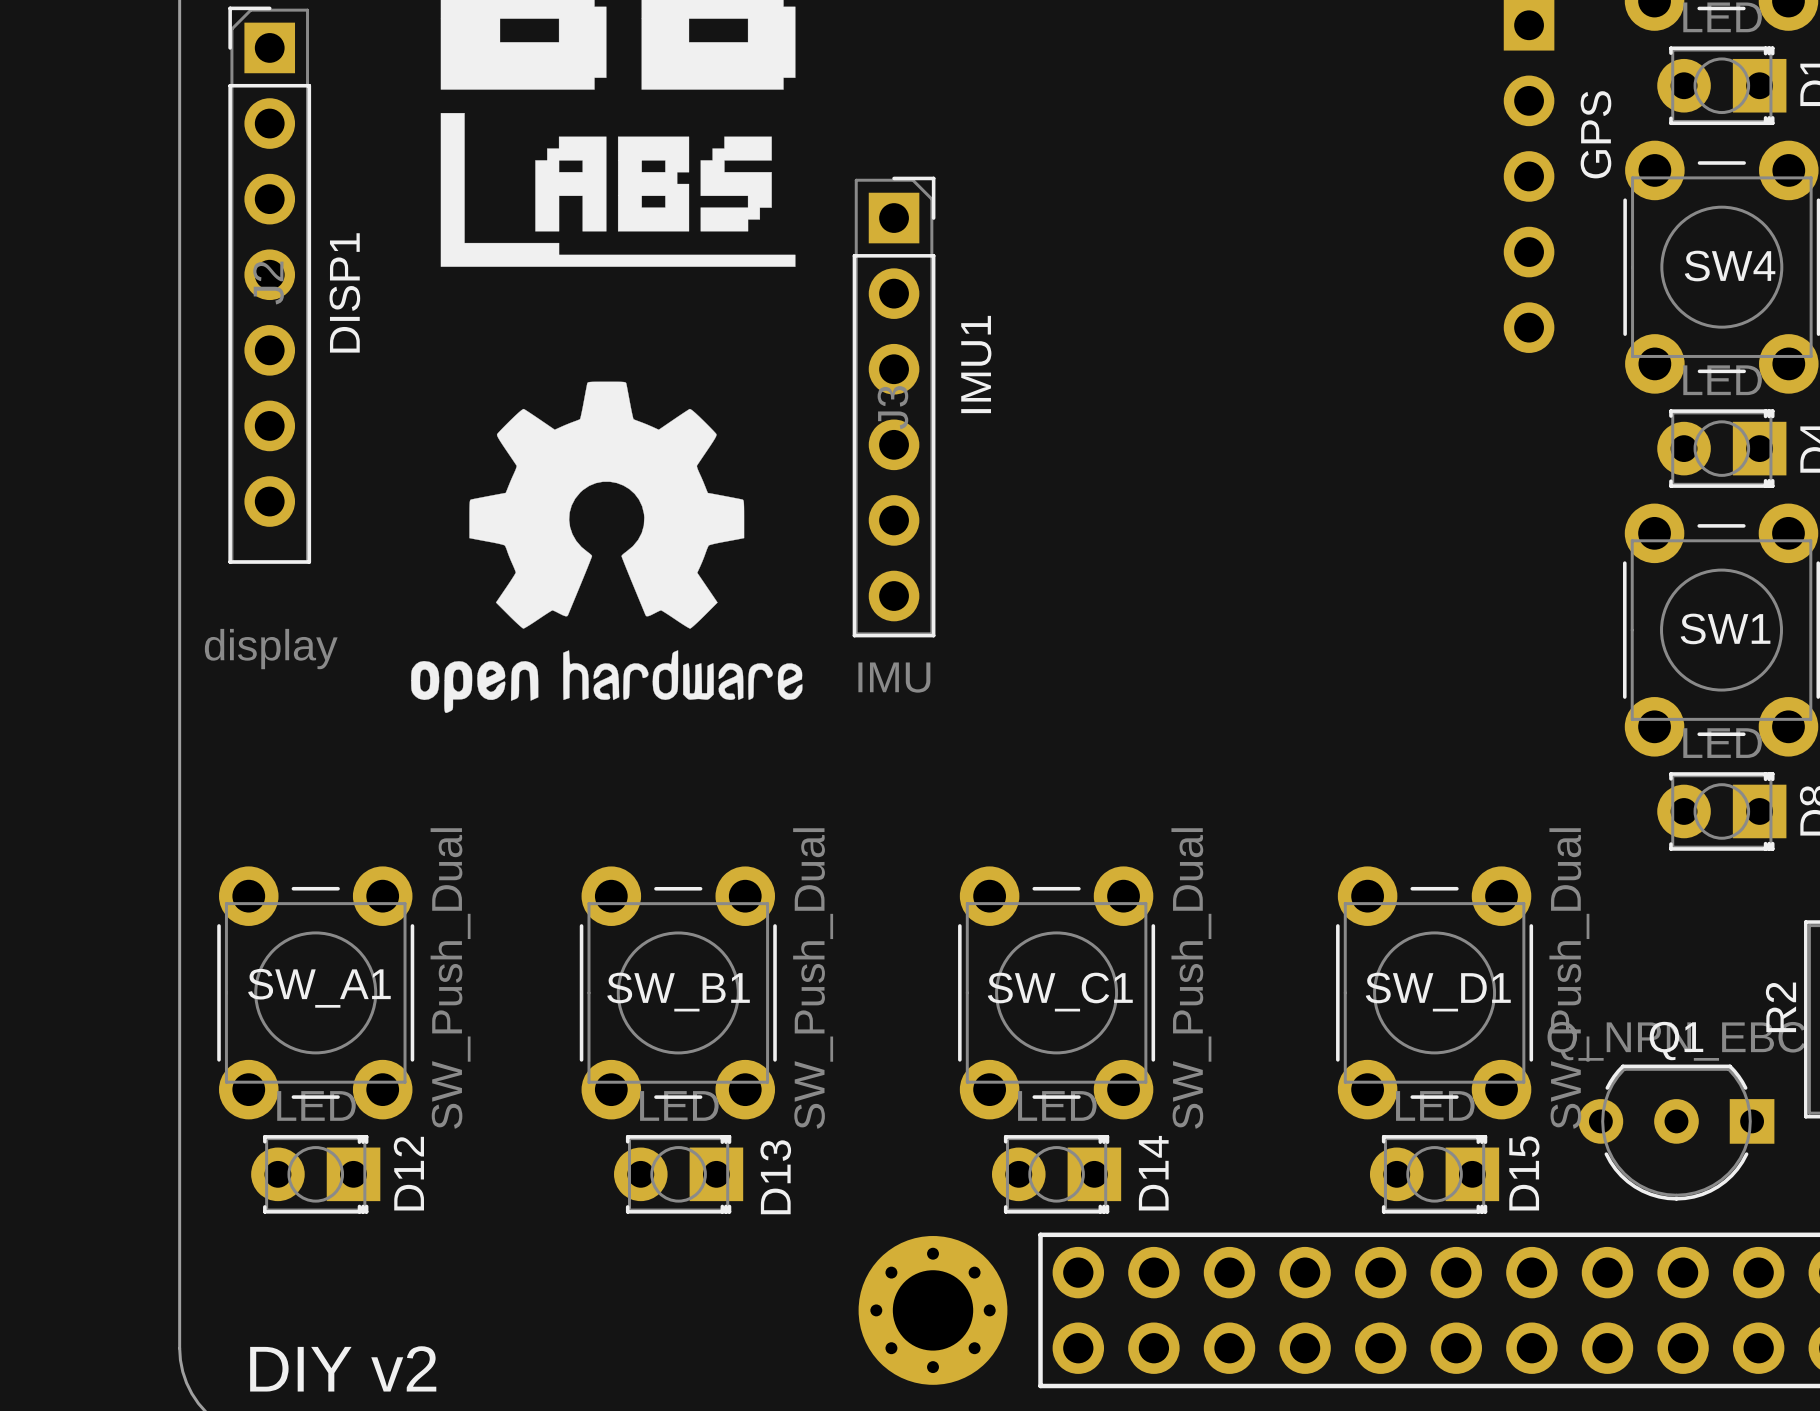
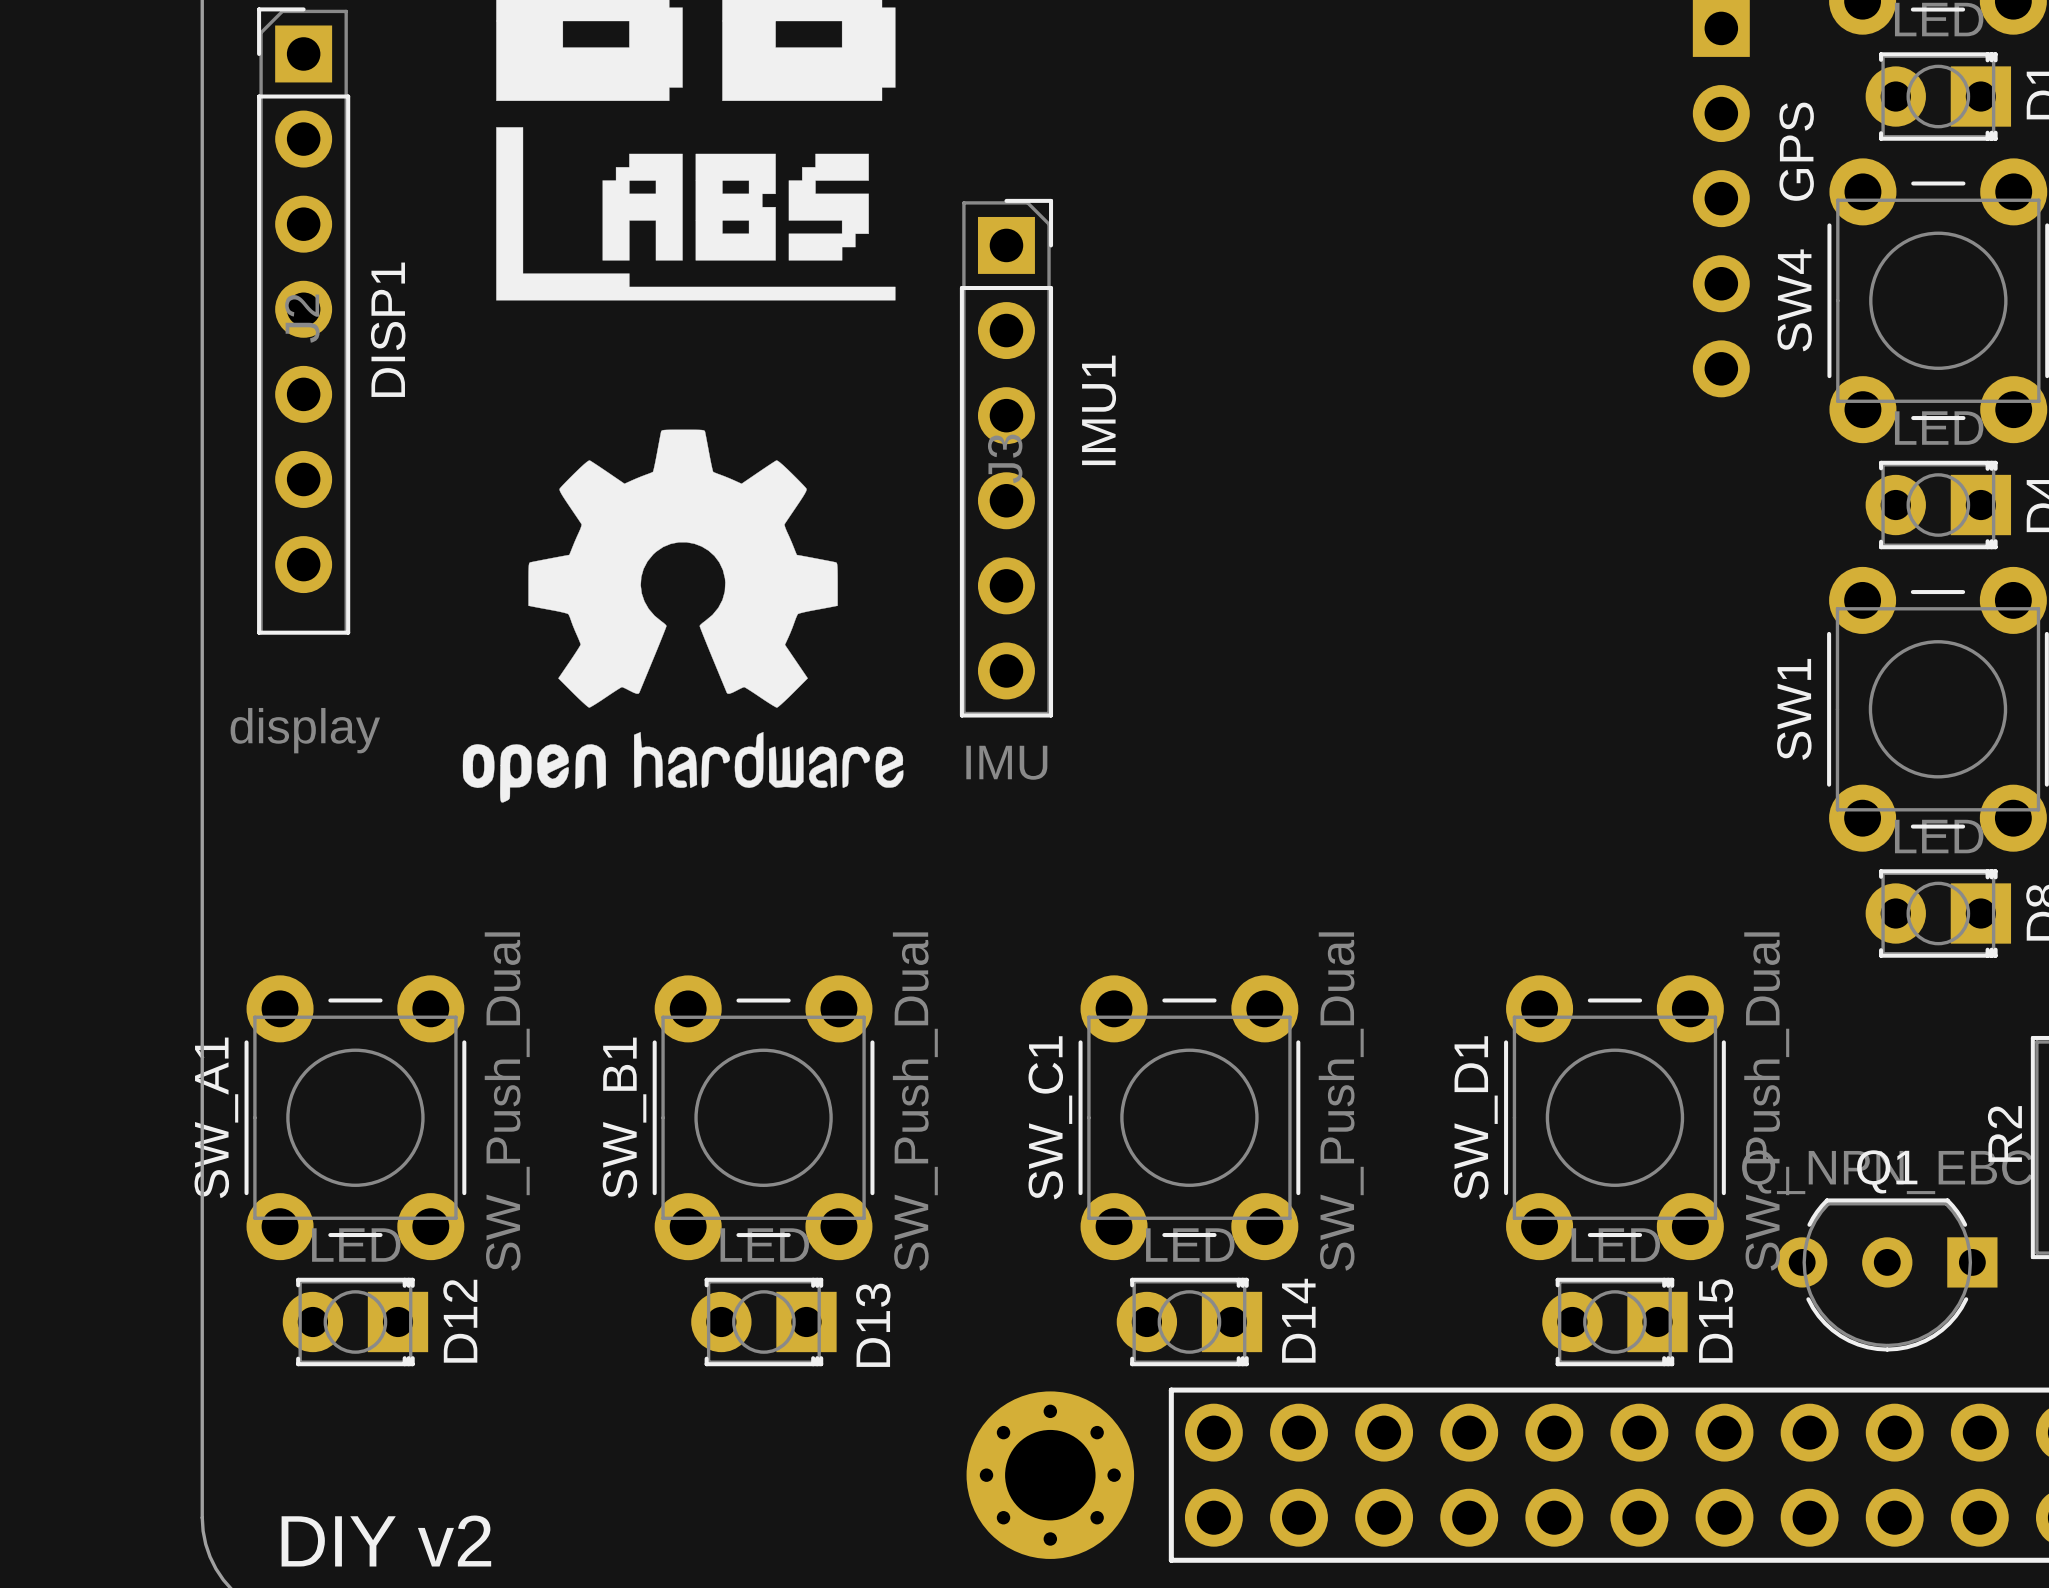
SW4 name rotation: 0° (1730, 266) -> 90° counterclockwise (1794, 300)
SW4 name position: SW4 (1730, 266) -> SW4 (1794, 300)
SW1 name rotation: 0° (1725, 628) -> 90° counterclockwise (1794, 709)
SW1 name position: SW1 (1725, 628) -> SW1 (1794, 709)
SW_A1 name rotation: 0° (319, 988) -> 90° counterclockwise (216, 1117)
SW_B1 name rotation: 0° (678, 992) -> 90° counterclockwise (624, 1117)
SW_C1 name rotation: 0° (1060, 992) -> 90° counterclockwise (1050, 1117)
SW_D1 name rotation: 0° (1438, 992) -> 90° counterclockwise (1475, 1117)

